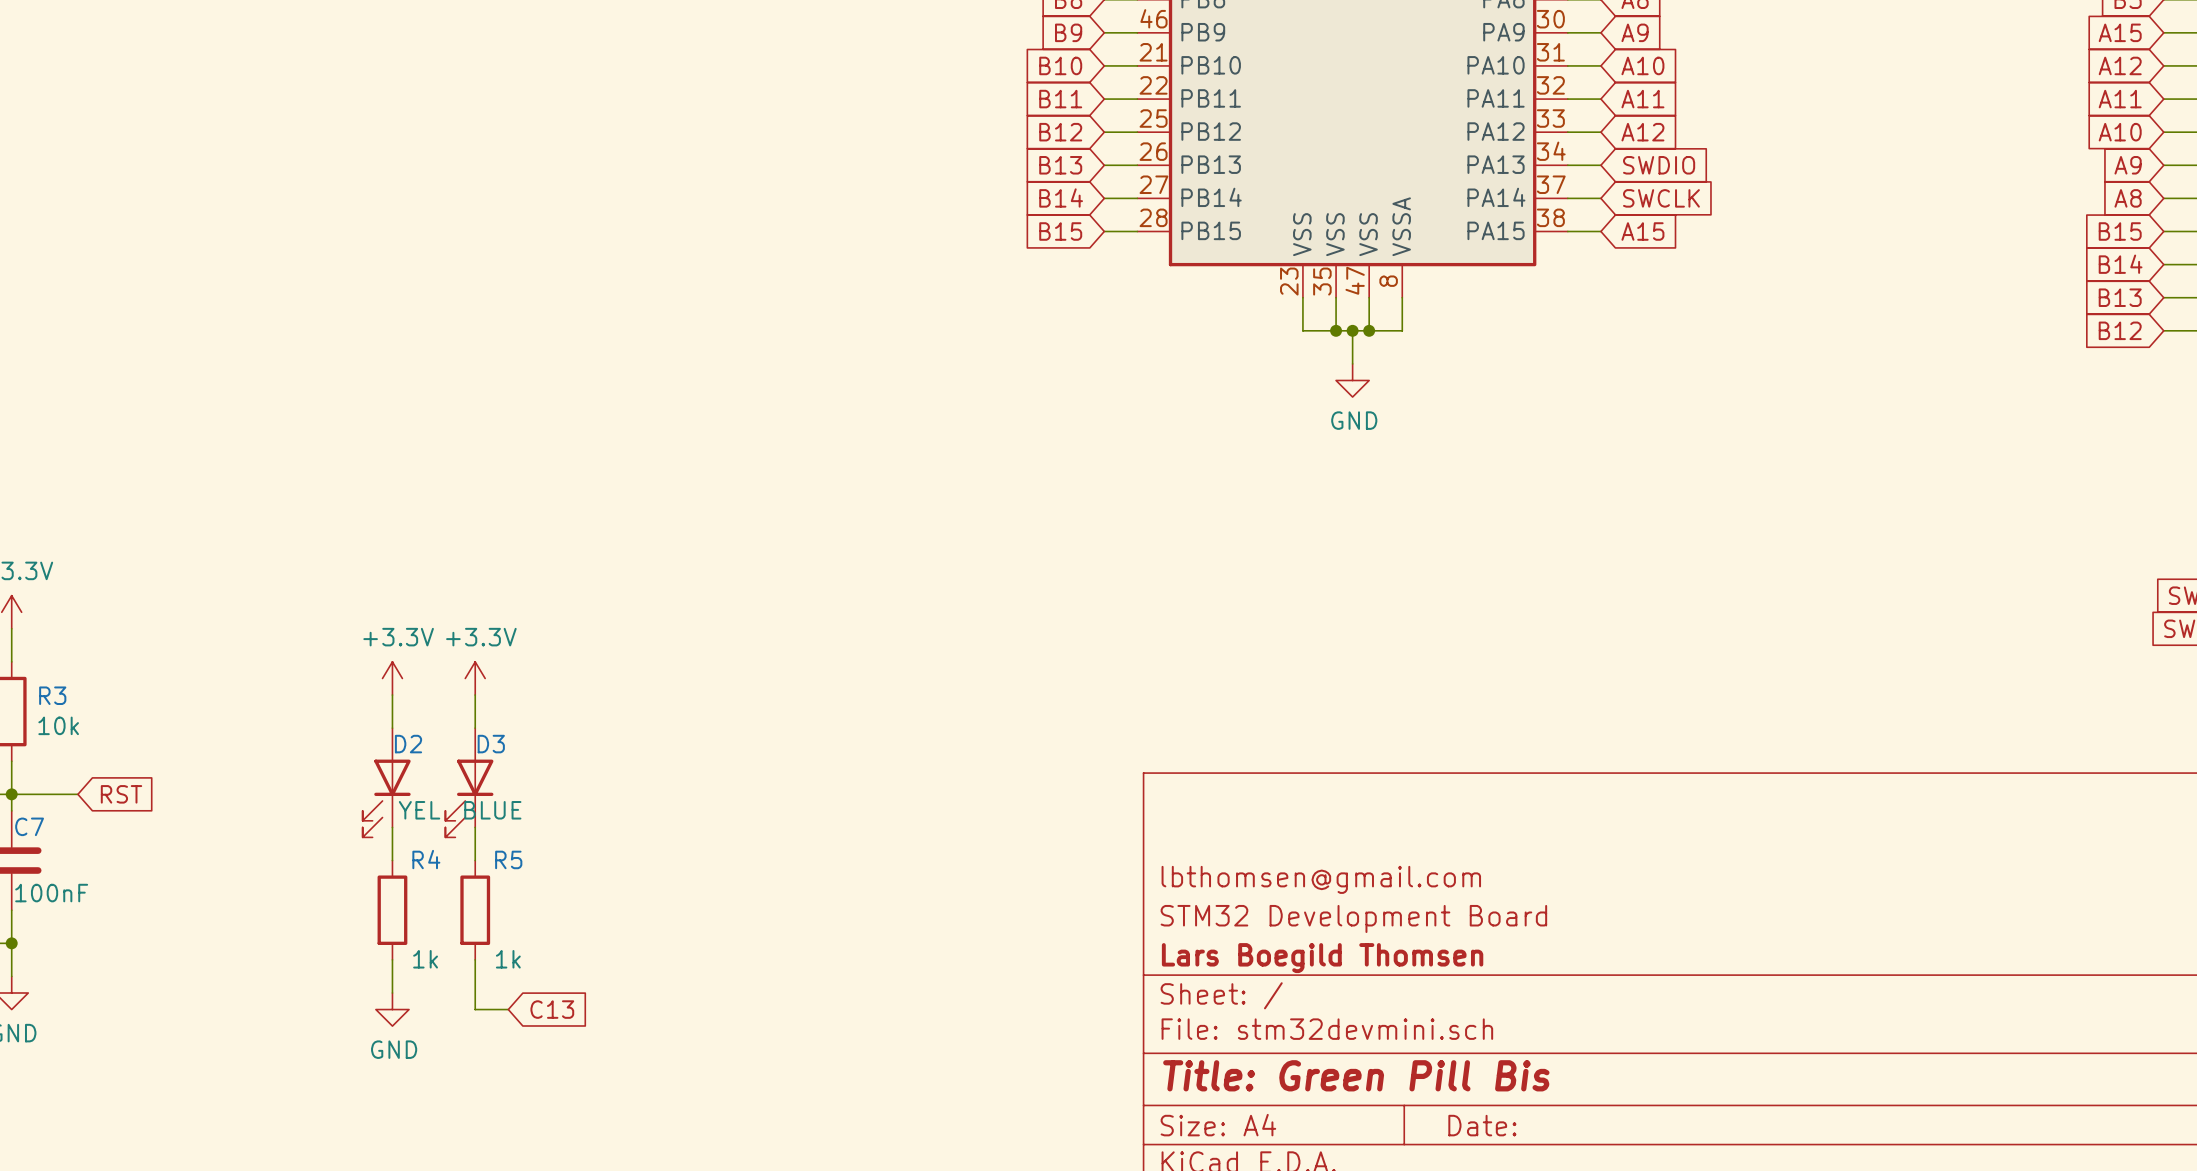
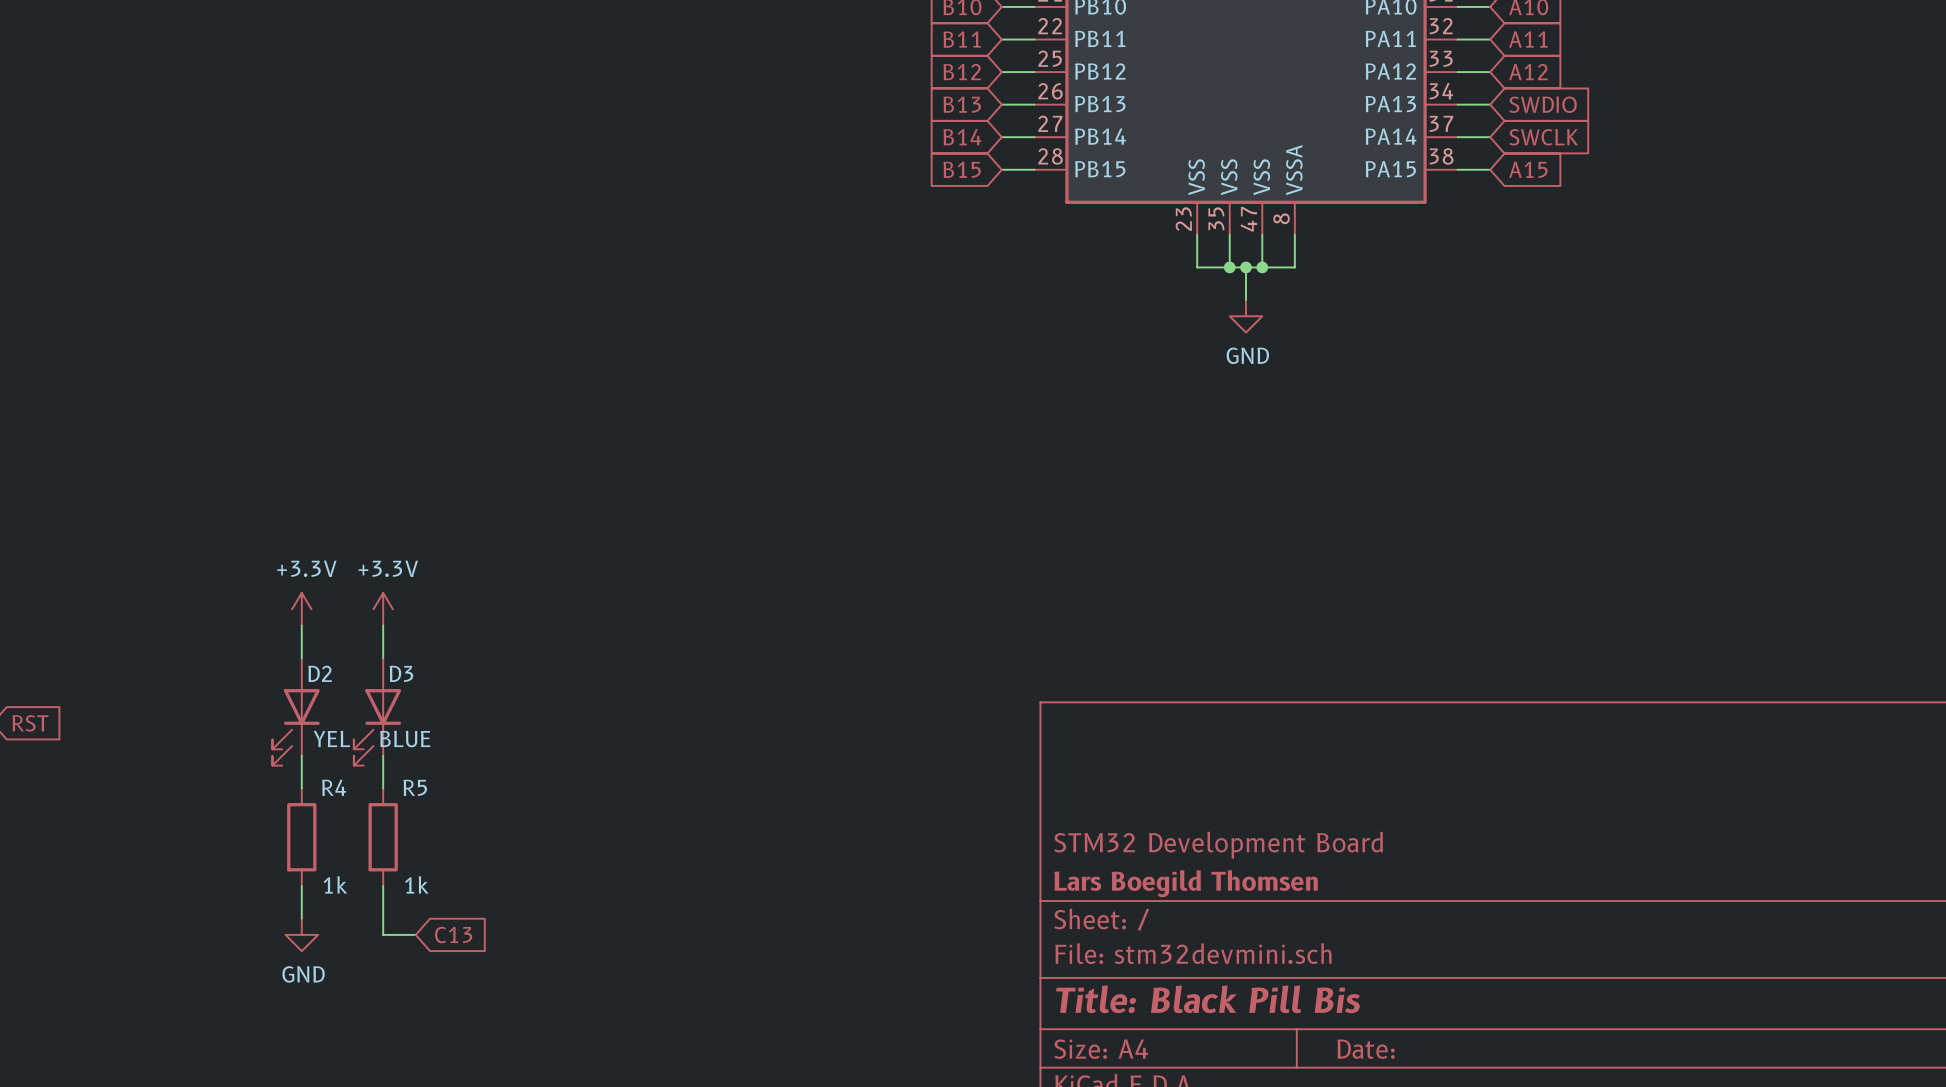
title block: lbthomsen@gmail.com (1321, 879) -> none
title block: Title: Green Pill Bis (1356, 1075) -> Title: Black Pill Bis (1207, 999)

